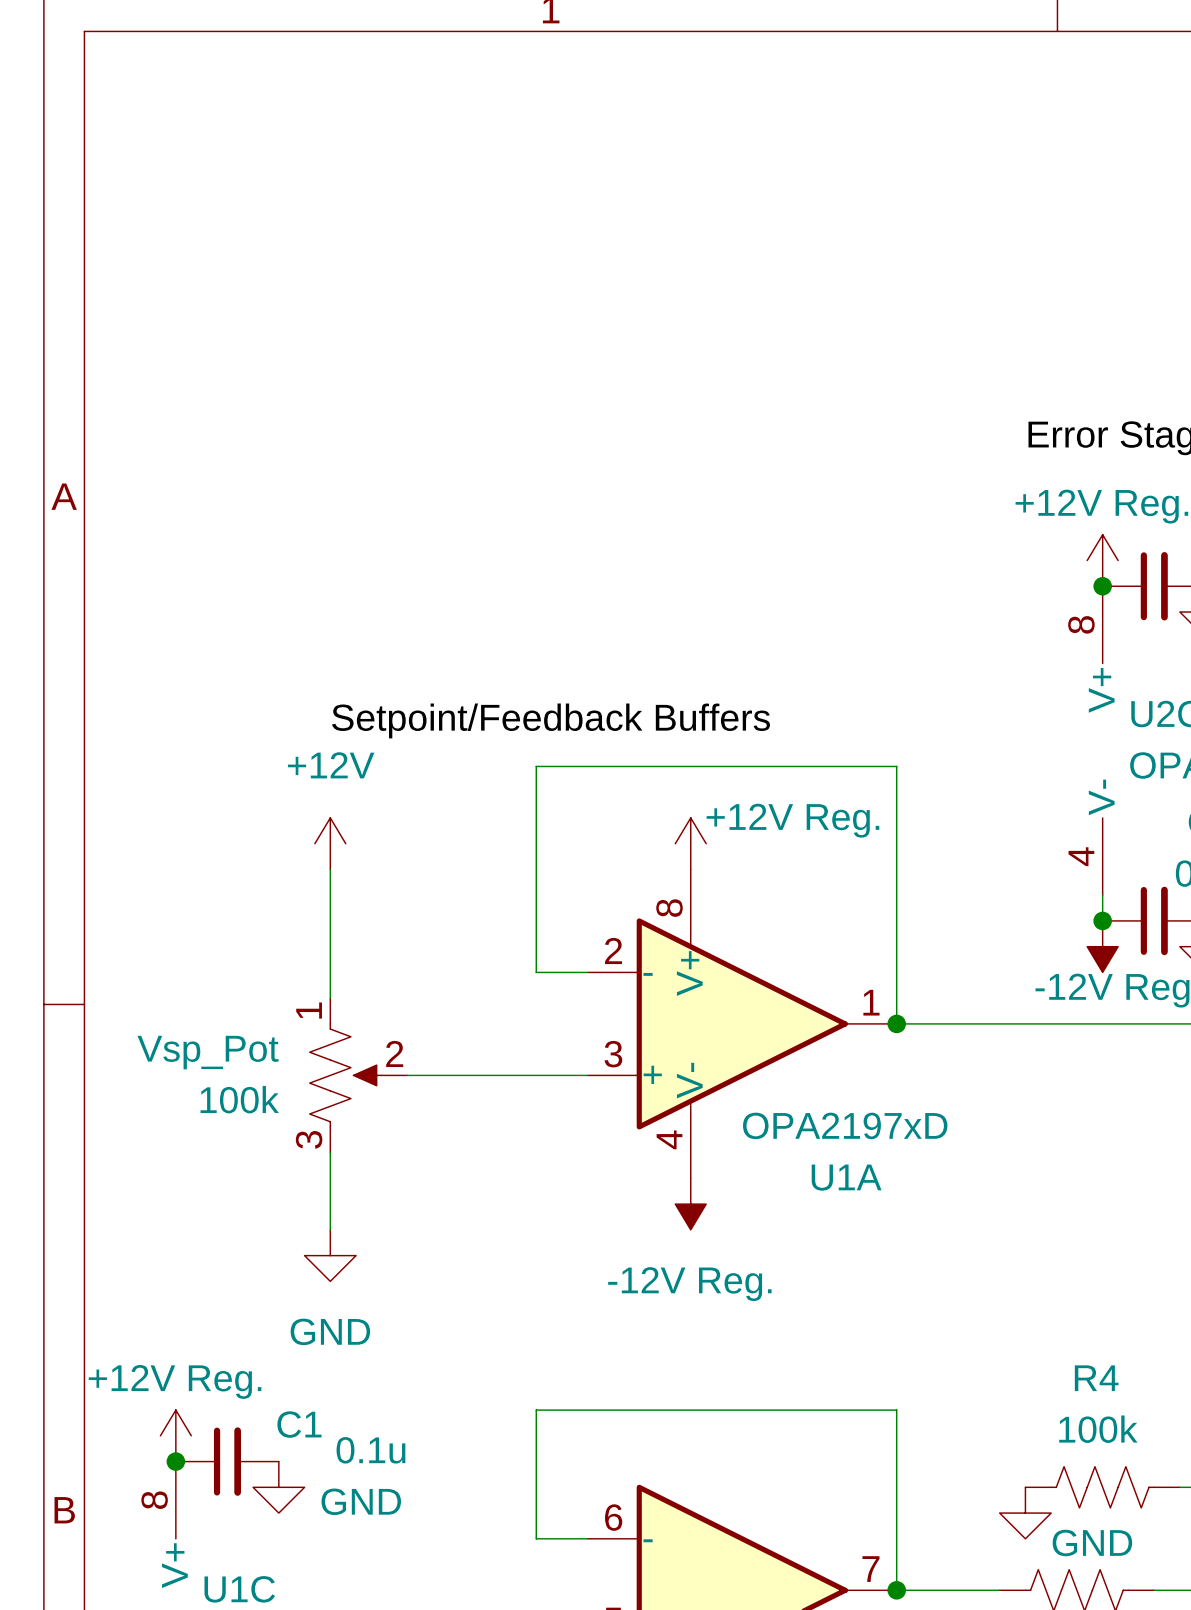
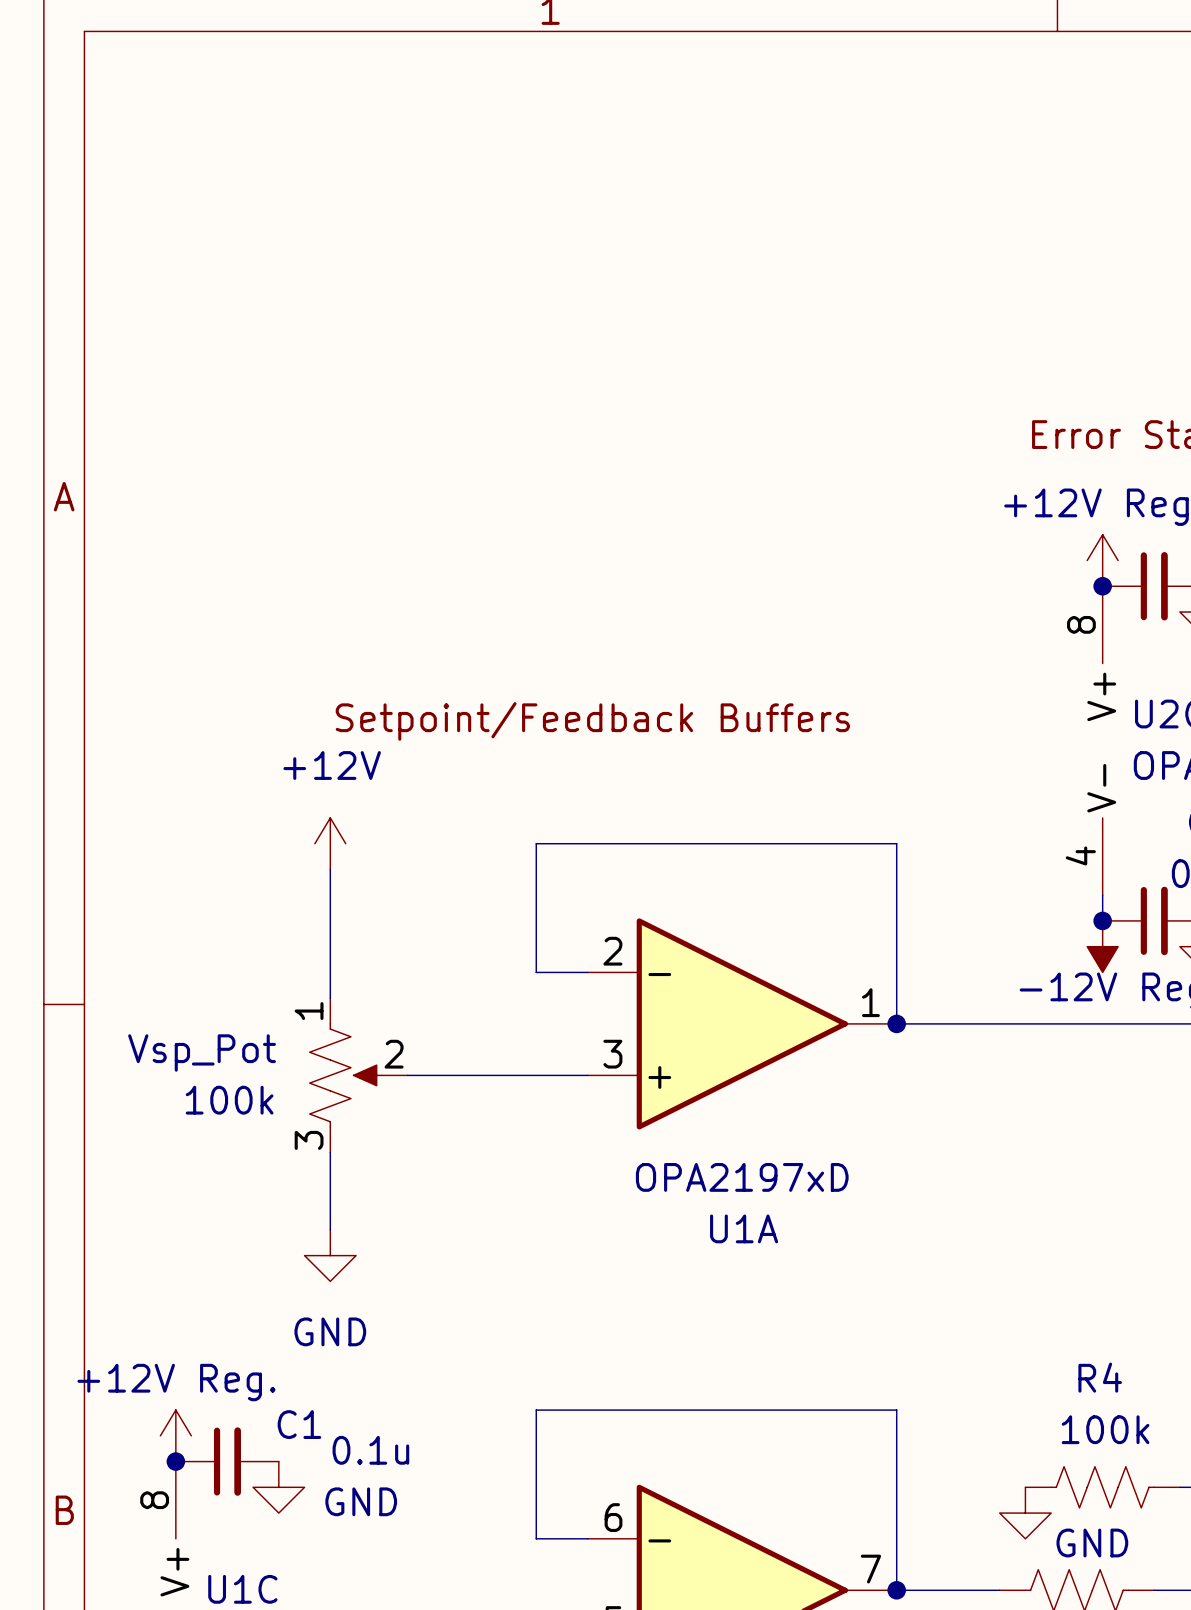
wire: (536, 843) (536, 766) (896, 766) (896, 843) -> (536, 843) (896, 843)
power symbol: +12V Reg. (690, 843) -> none
part: (690, 1023) -> none
U1A value position: OPA2197xD (845, 1125) -> OPA2197xD (742, 1177)
U1A name position: U1A (846, 1177) -> U1A (744, 1228)
power symbol: -12V Reg. (690, 1204) -> none

